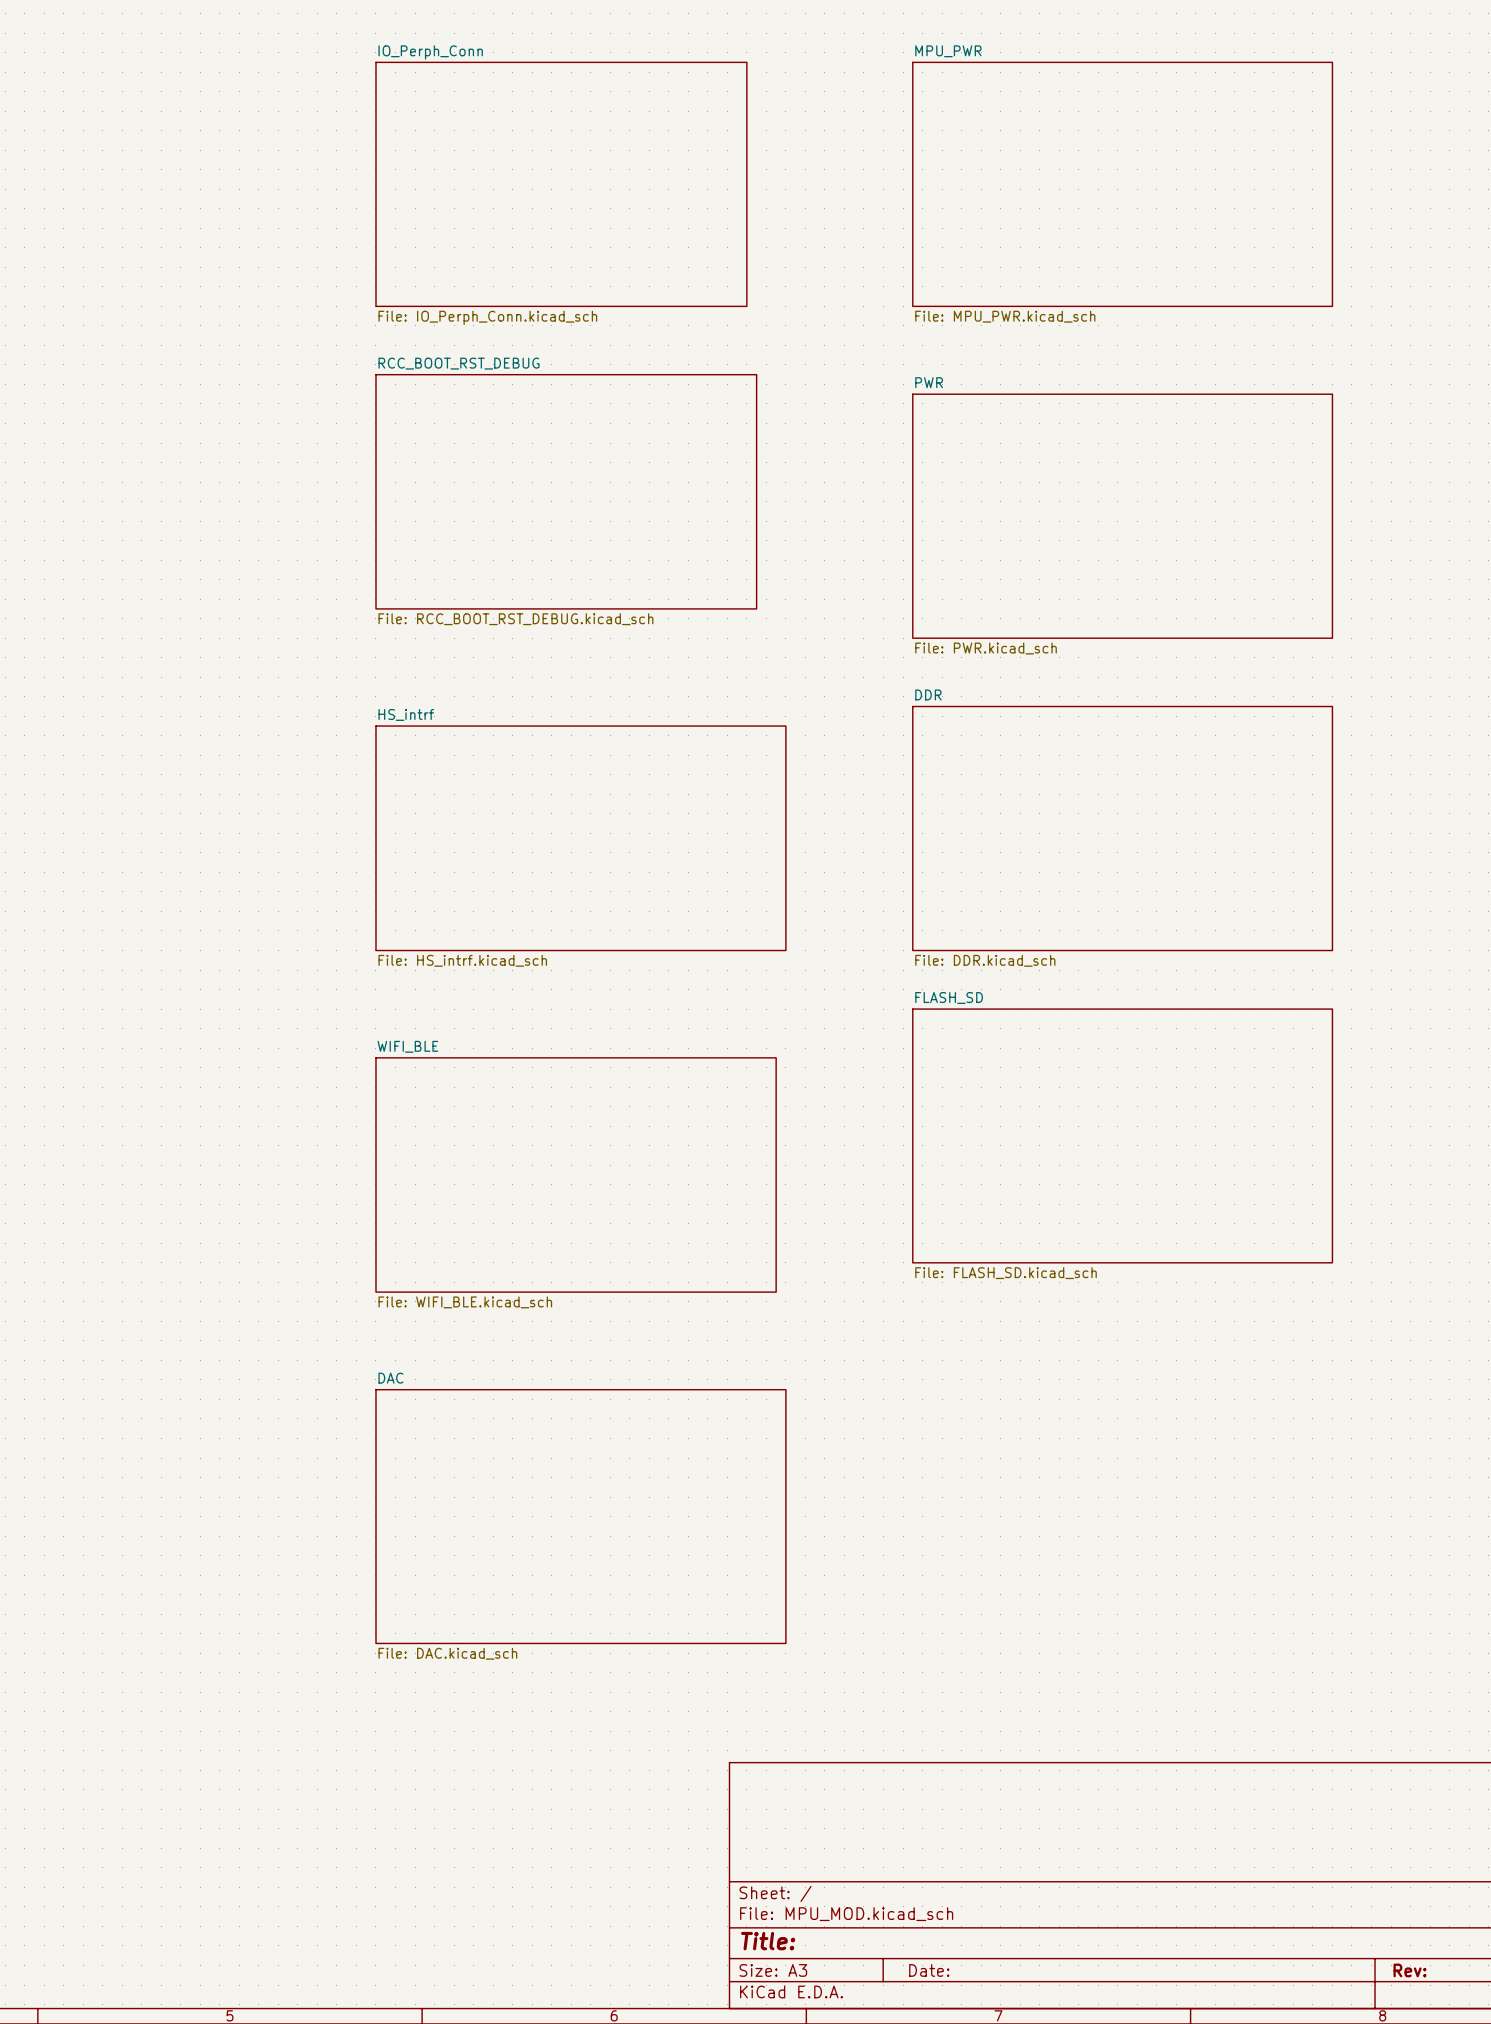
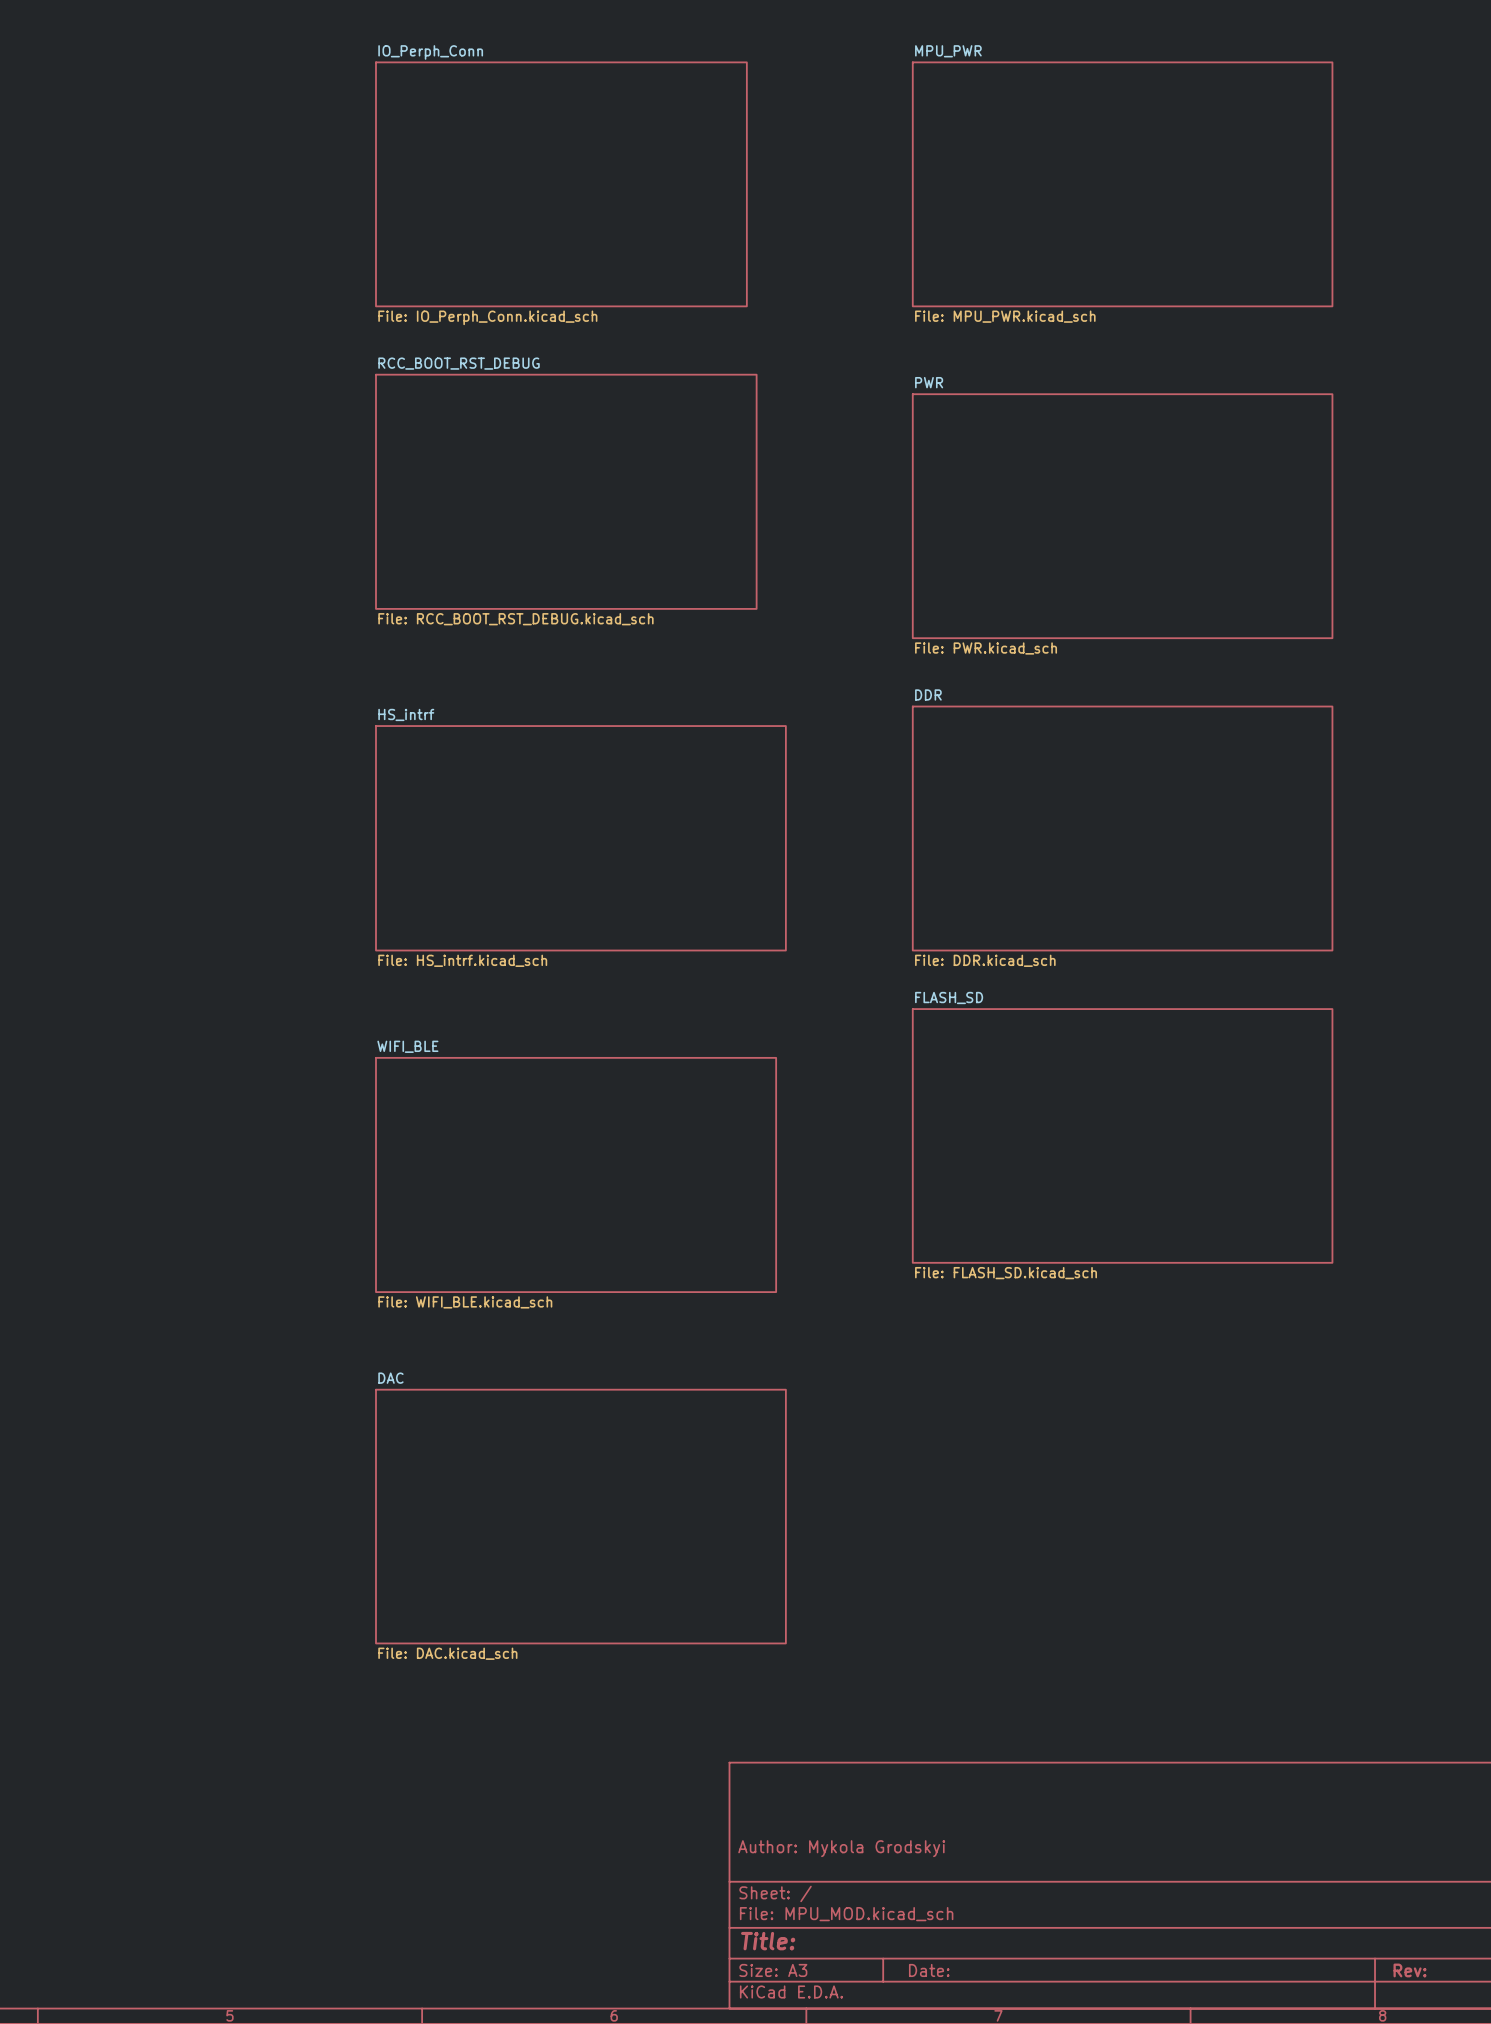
title block: none -> Author: Mykola Grodskyi (841, 1848)

